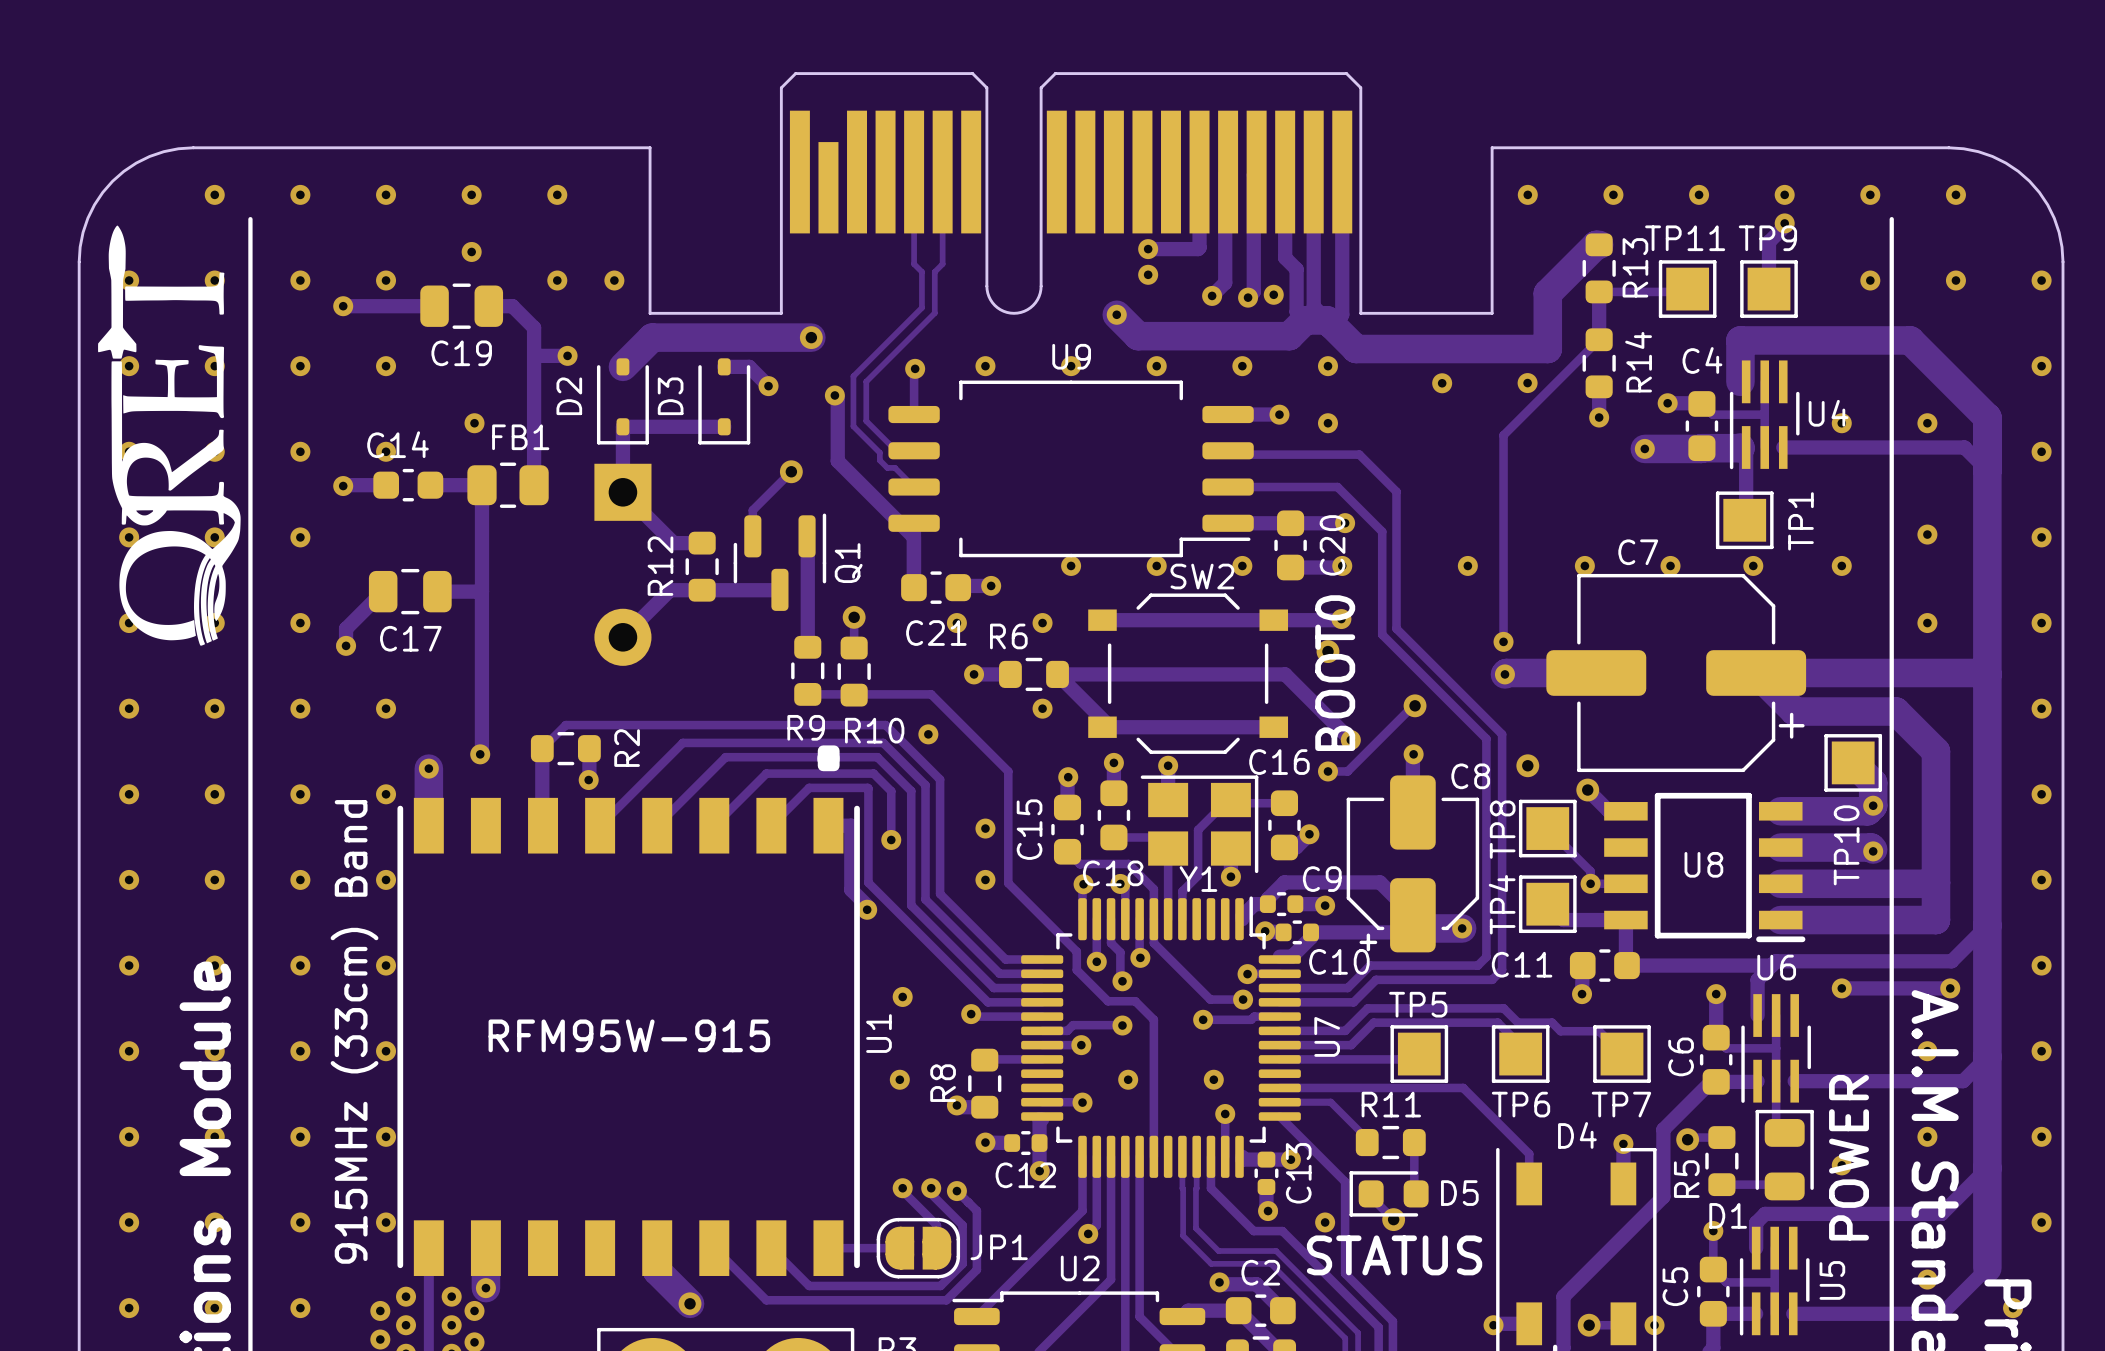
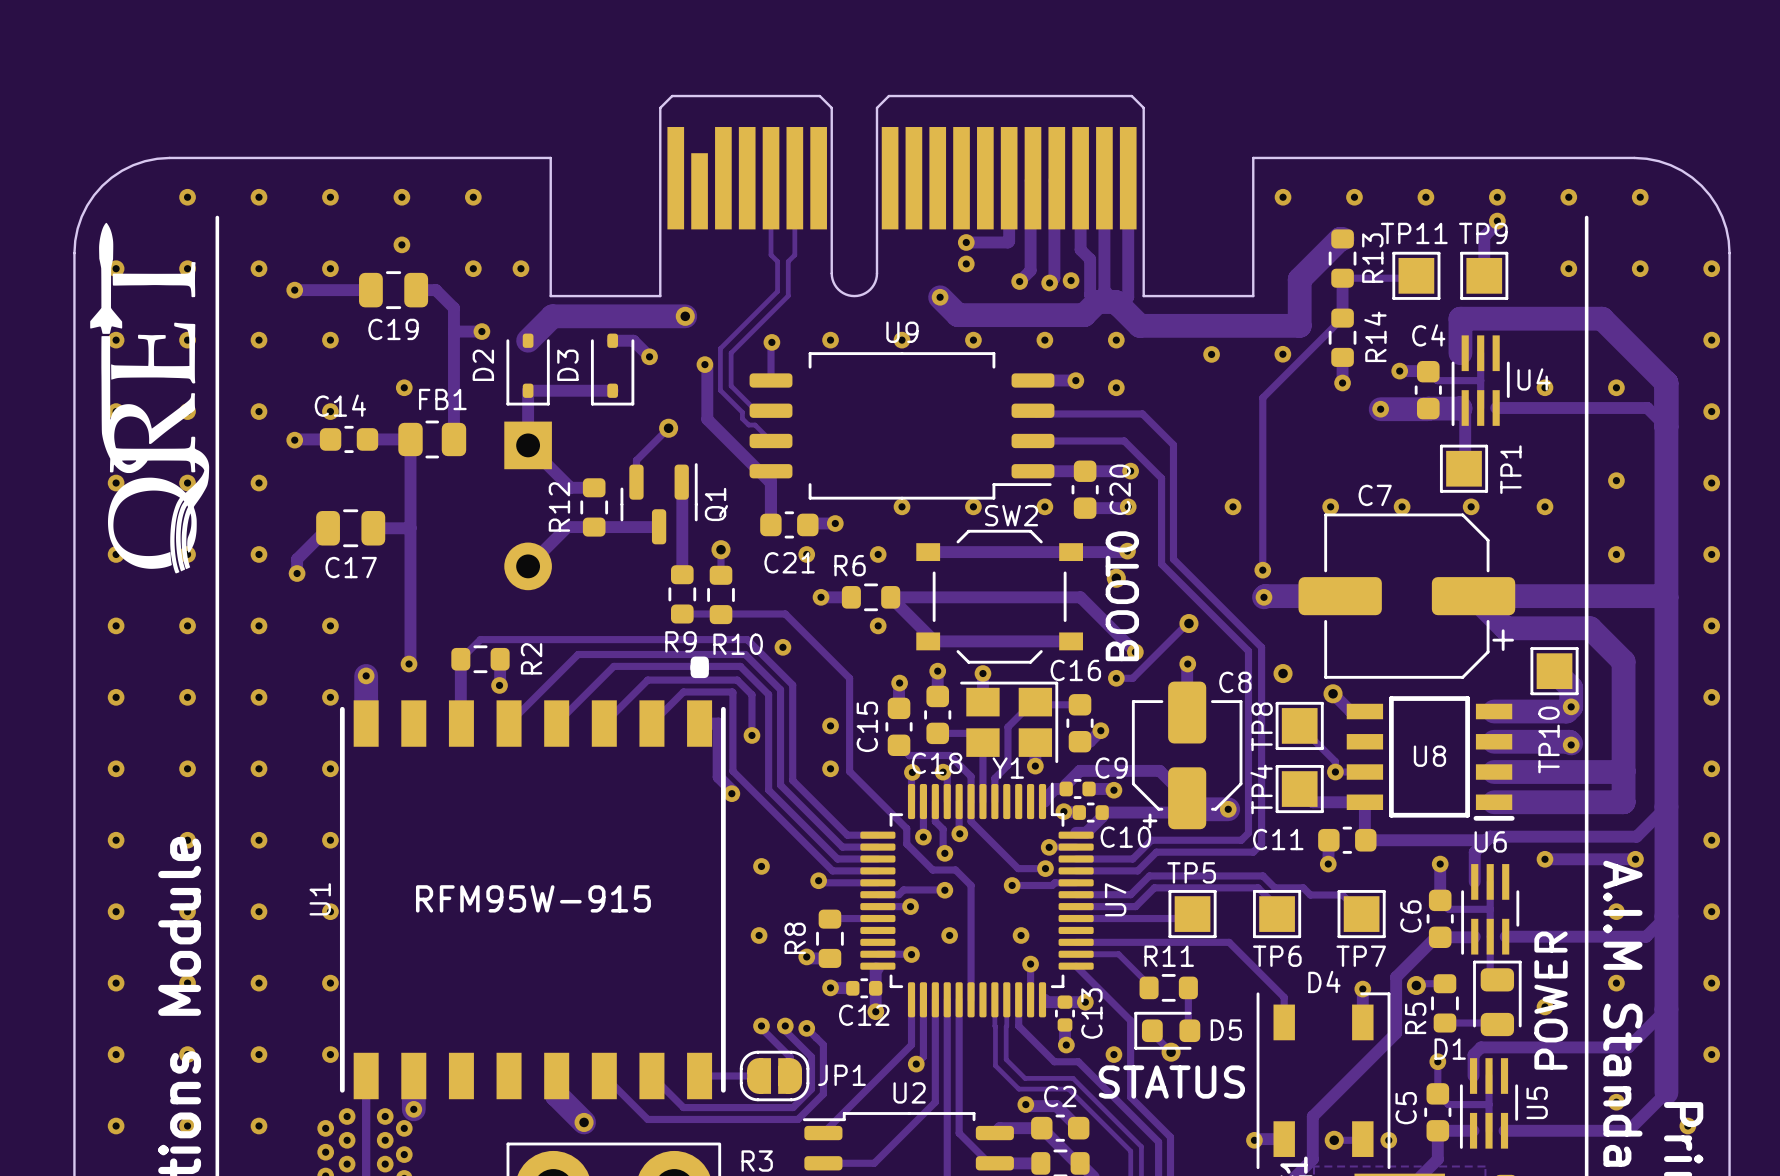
text: 915MHz (33cm) Band (354, 1031) -> none
U1 name position: U1 (878, 1033) -> U1 (320, 899)

